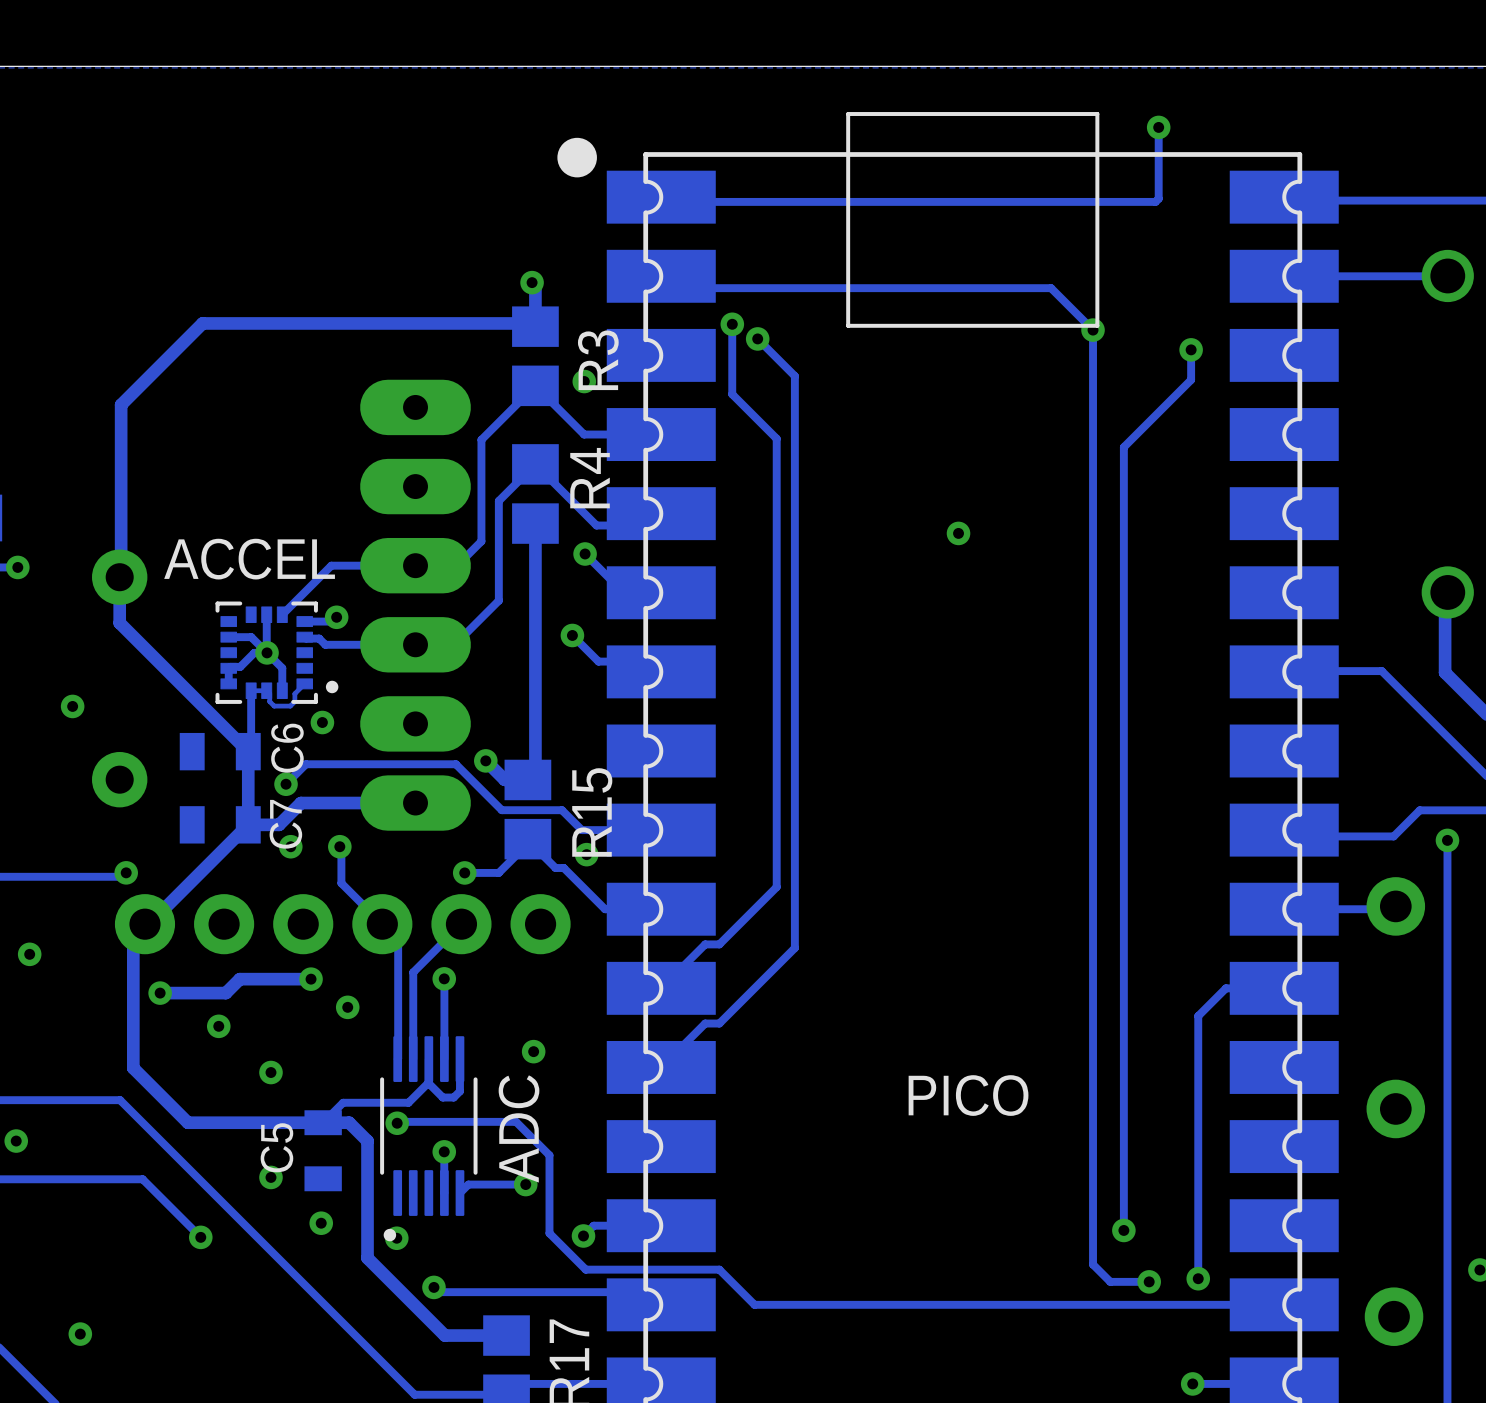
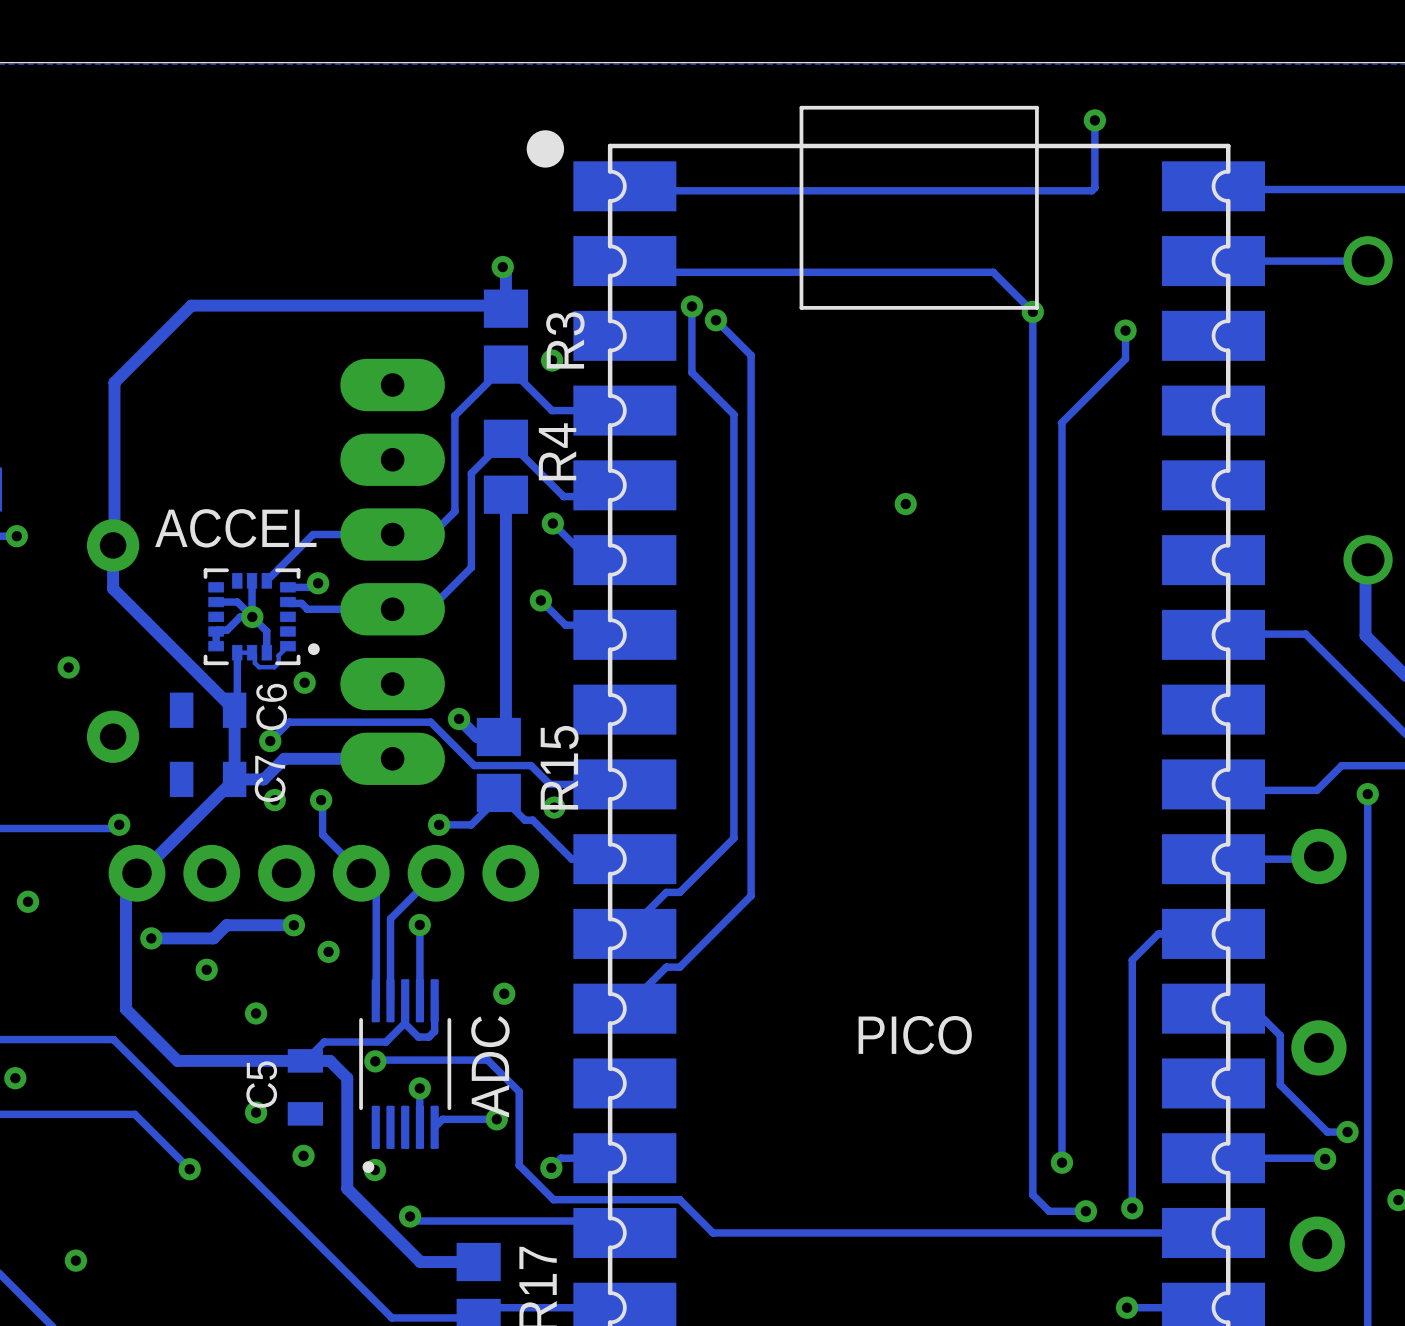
track: none -> (1213, 1008) (1253, 1008) (1280, 1035) (1280, 1084) (1327, 1132) (1347, 1132)
via: none -> (1347, 1132)
track: none -> (1213, 1158) (1325, 1158)
via: none -> (1325, 1158)

